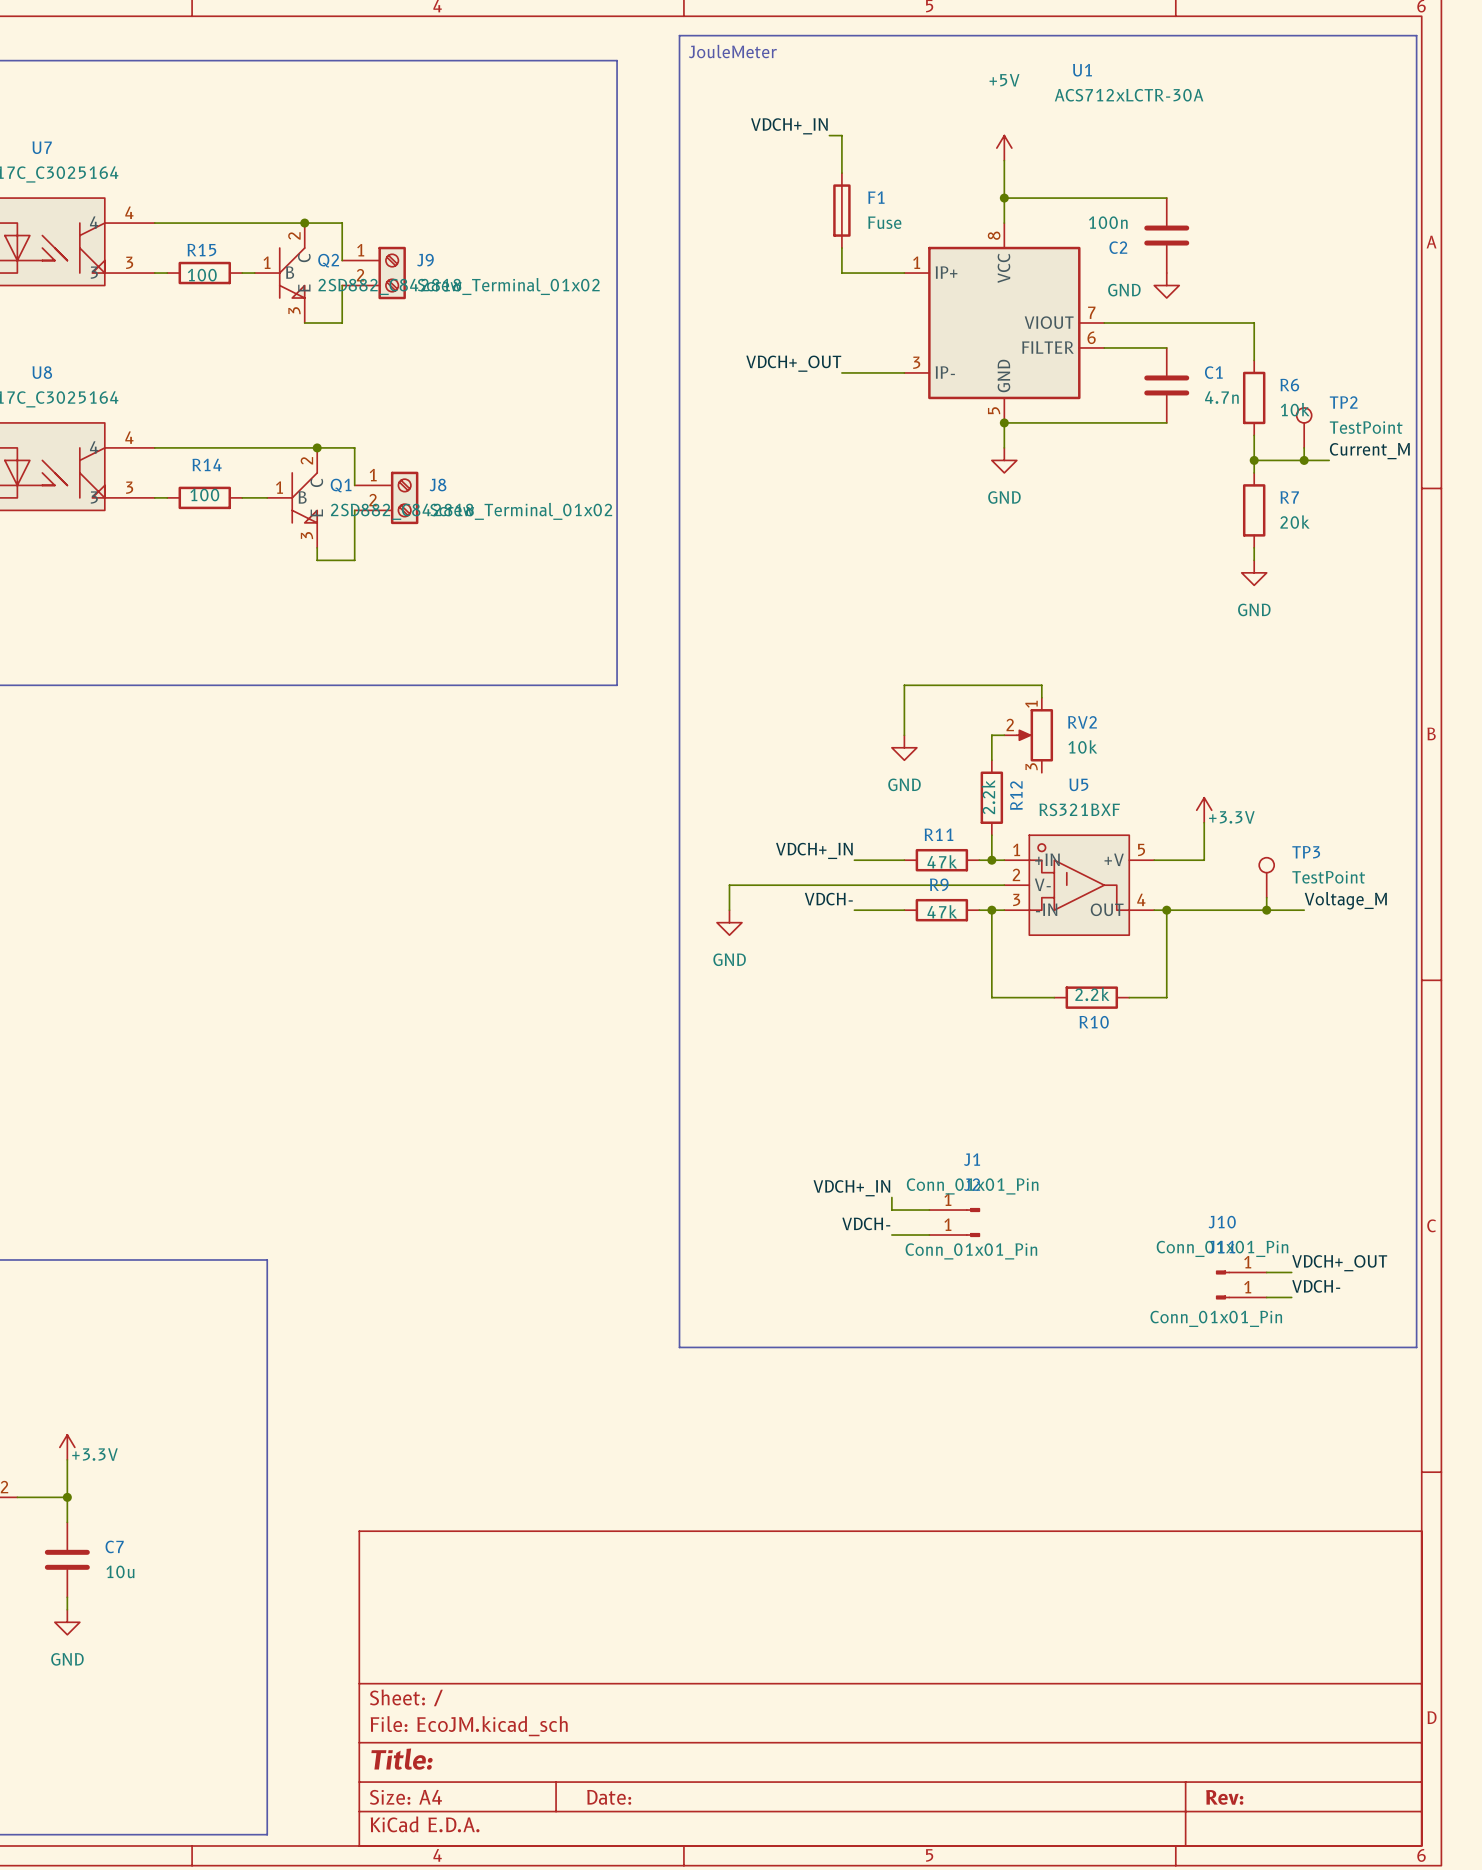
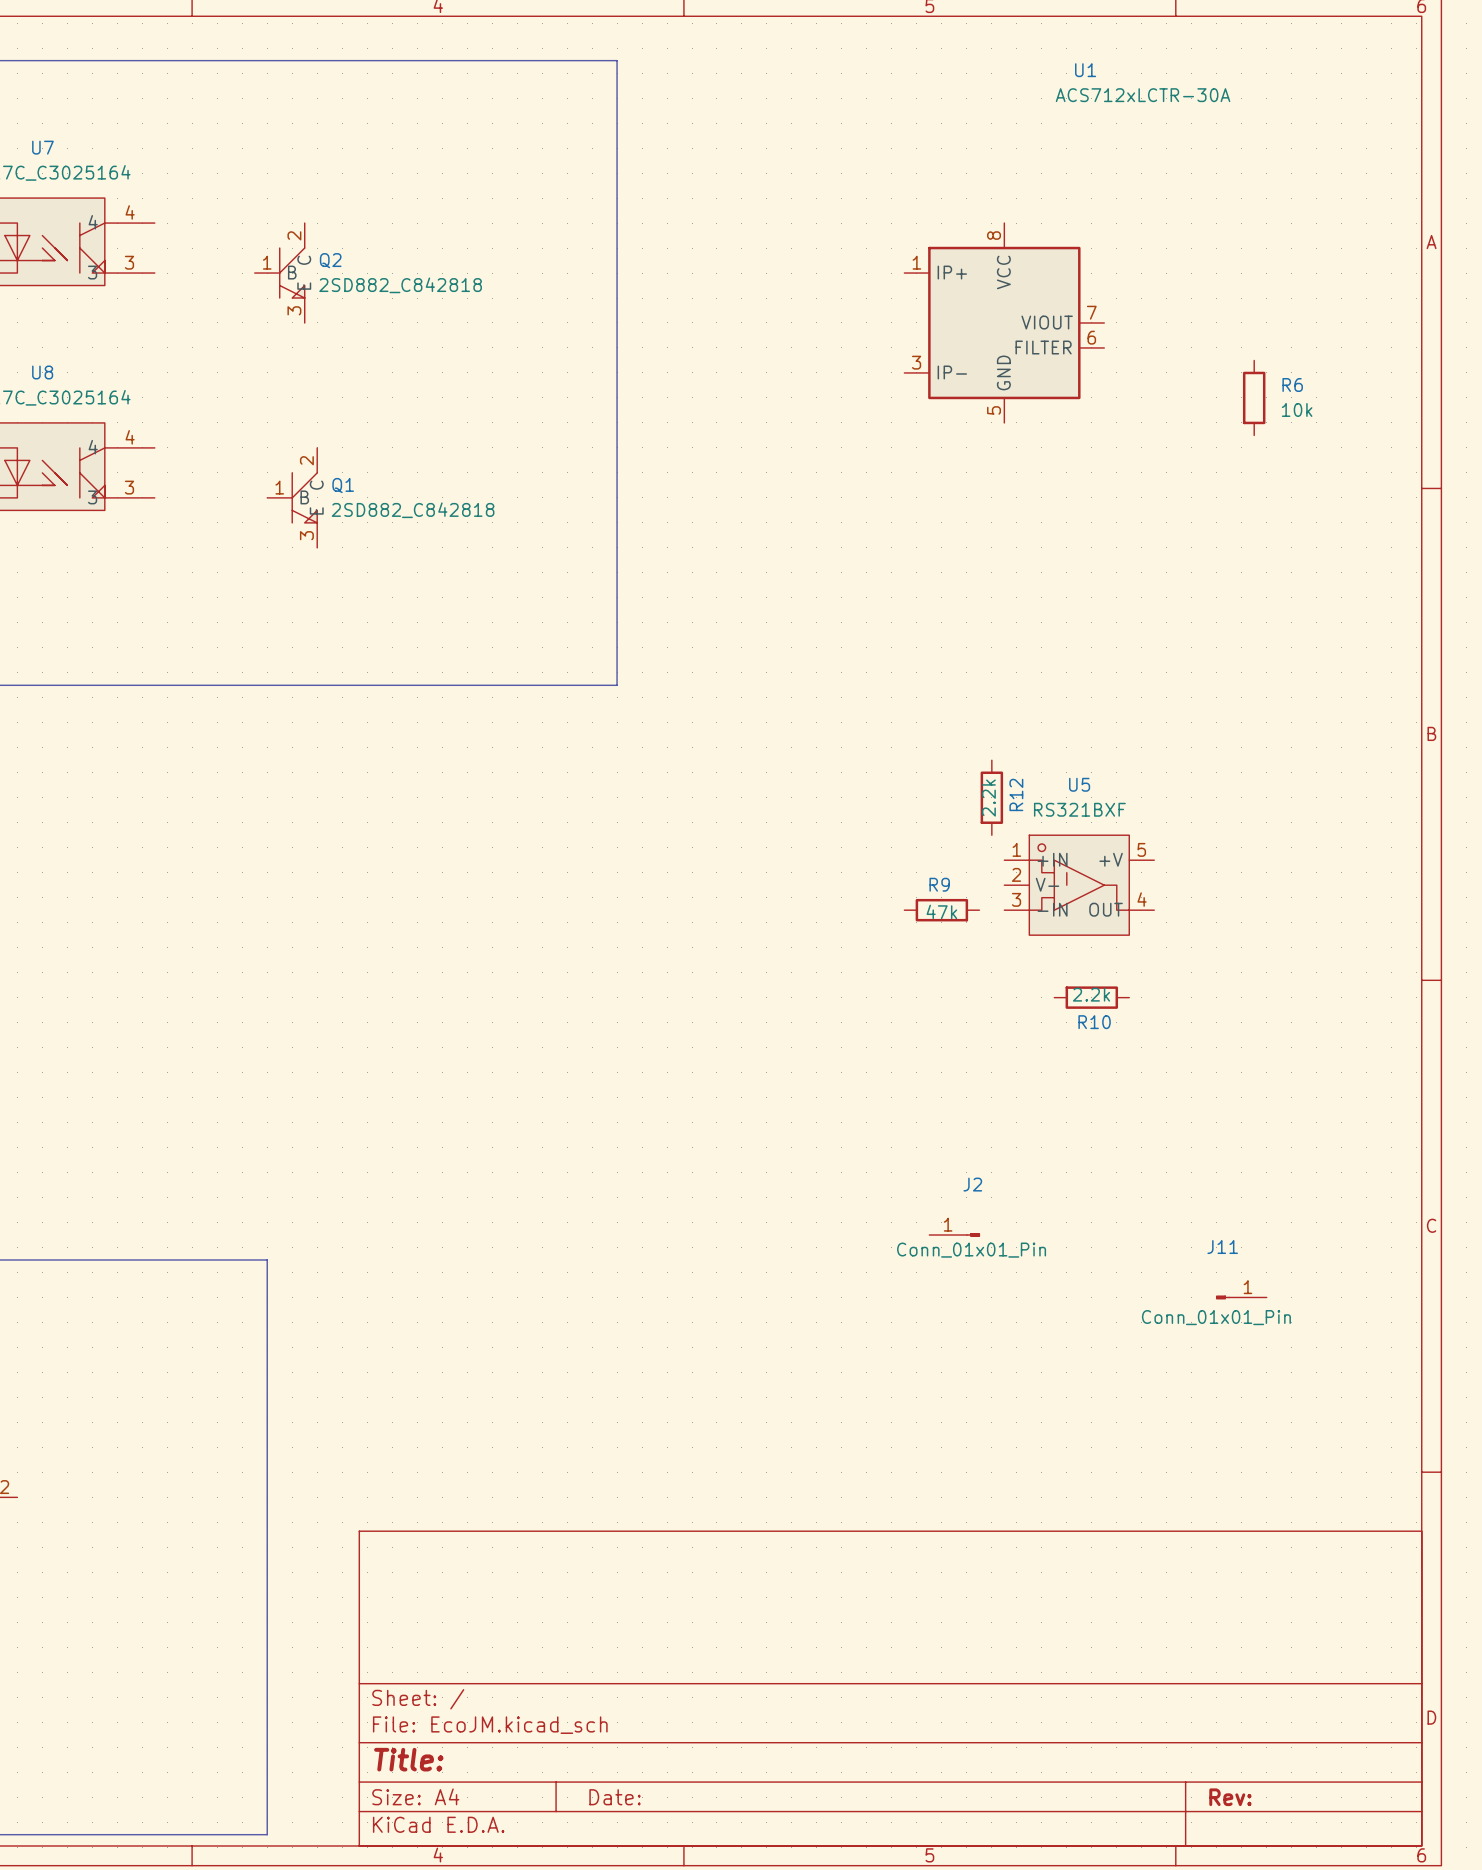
line: (679, 35) (1416, 35) (1416, 1347) (679, 1347) (679, 35) -> none
text: JouleMeter (732, 51) -> none
label: VDCH+_IN (789, 126) -> none
wire: (829, 135) (841, 135) (841, 173) -> none
power symbol: +5V (1004, 148) -> none
wire: (1004, 160) (1004, 223) -> none
wire: (1004, 198) (1166, 198) -> none
junction: (1004, 198) -> none
F1: Fuse (841, 210) -> none
wire: (154, 223) (342, 223) (342, 260) -> none
junction: (304, 223) -> none
C2: 100n (1166, 235) -> none
wire: (841, 248) (841, 273) (904, 273) -> none
wire: (154, 273) (167, 273) -> none
R15: 100 (204, 273) -> none
wire: (242, 273) (254, 273) -> none
J9: Screw_Terminal_01x02 (374, 273) -> none
wire: (342, 285) (342, 322) (304, 322) -> none
power symbol: GND (1166, 285) -> none
wire: (1104, 322) (1254, 322) (1254, 360) -> none
wire: (1104, 347) (1166, 347) -> none
label: VDCH+_OUT (793, 363) -> none
wire: (841, 372) (904, 372) -> none
C1: 4.7n (1166, 385) -> none
junction: (1004, 422) -> none
wire: (1166, 422) (1004, 422) (1004, 447) -> none
TP2: TestPoint (1304, 427) -> none
wire: (1254, 435) (1254, 472) -> none
wire: (154, 447) (354, 447) (354, 485) -> none
junction: (317, 447) -> none
wire: (1304, 447) (1304, 460) -> none
label: Current_M (1369, 451) -> none
power symbol: GND (1004, 460) -> none
wire: (1254, 460) (1329, 460) -> none
junction: (1254, 460) -> none
junction: (1304, 460) -> none
wire: (154, 497) (167, 497) -> none
R14: 100 (204, 497) -> none
wire: (242, 497) (267, 497) -> none
J8: Screw_Terminal_01x02 (386, 497) -> none
wire: (354, 510) (354, 560) (317, 560) (317, 547) -> none
R7: 20k (1254, 510) -> none
wire: (1254, 547) (1254, 560) -> none
power symbol: GND (1254, 572) -> none
wire: (1041, 697) (1041, 685) (904, 685) (904, 735) -> none
wire: (1004, 735) (991, 735) (991, 760) -> none
RV2: 10k (1028, 735) -> none
power symbol: GND (904, 747) -> none
power symbol: +3.3V (1204, 810) -> none
wire: (1204, 822) (1204, 860) (1154, 860) -> none
wire: (991, 835) (991, 860) -> none
label: VDCH+_IN (814, 850) -> none
wire: (854, 860) (904, 860) -> none
R11: 47k (941, 860) -> none
wire: (979, 860) (1004, 860) -> none
junction: (991, 860) -> none
TP3: TestPoint (1266, 877) -> none
wire: (1004, 885) (729, 885) (729, 910) -> none
wire: (1266, 897) (1266, 910) -> none
label: VDCH- (828, 899) -> none
label: Voltage_M (1345, 900) -> none
wire: (854, 910) (904, 910) -> none
wire: (979, 910) (1004, 910) -> none
wire: (991, 910) (991, 997) (1054, 997) -> none
junction: (991, 910) -> none
wire: (1154, 910) (1304, 910) -> none
wire: (1166, 910) (1166, 997) (1129, 997) -> none
junction: (1166, 910) -> none
junction: (1266, 910) -> none
power symbol: GND (729, 922) -> none
label: VDCH+_IN (851, 1188) -> none
wire: (891, 1197) (891, 1210) (929, 1210) -> none
J1: Conn_01x01_Pin (954, 1210) -> none
label: VDCH- (866, 1223) -> none
wire: (891, 1235) (929, 1235) -> none
label: VDCH+_OUT (1339, 1263) -> none
J10: Conn_01x01_Pin (1241, 1272) -> none
wire: (1266, 1272) (1291, 1272) -> none
label: VDCH- (1316, 1286) -> none
wire: (1266, 1297) (1291, 1297) -> none
power symbol: +3.3V (67, 1447) -> none
wire: (67, 1459) (67, 1522) -> none
wire: (17, 1497) (67, 1497) -> none
junction: (67, 1497) -> none
C7: 10u (67, 1559) -> none
wire: (67, 1597) (67, 1609) -> none
power symbol: GND (67, 1622) -> none

